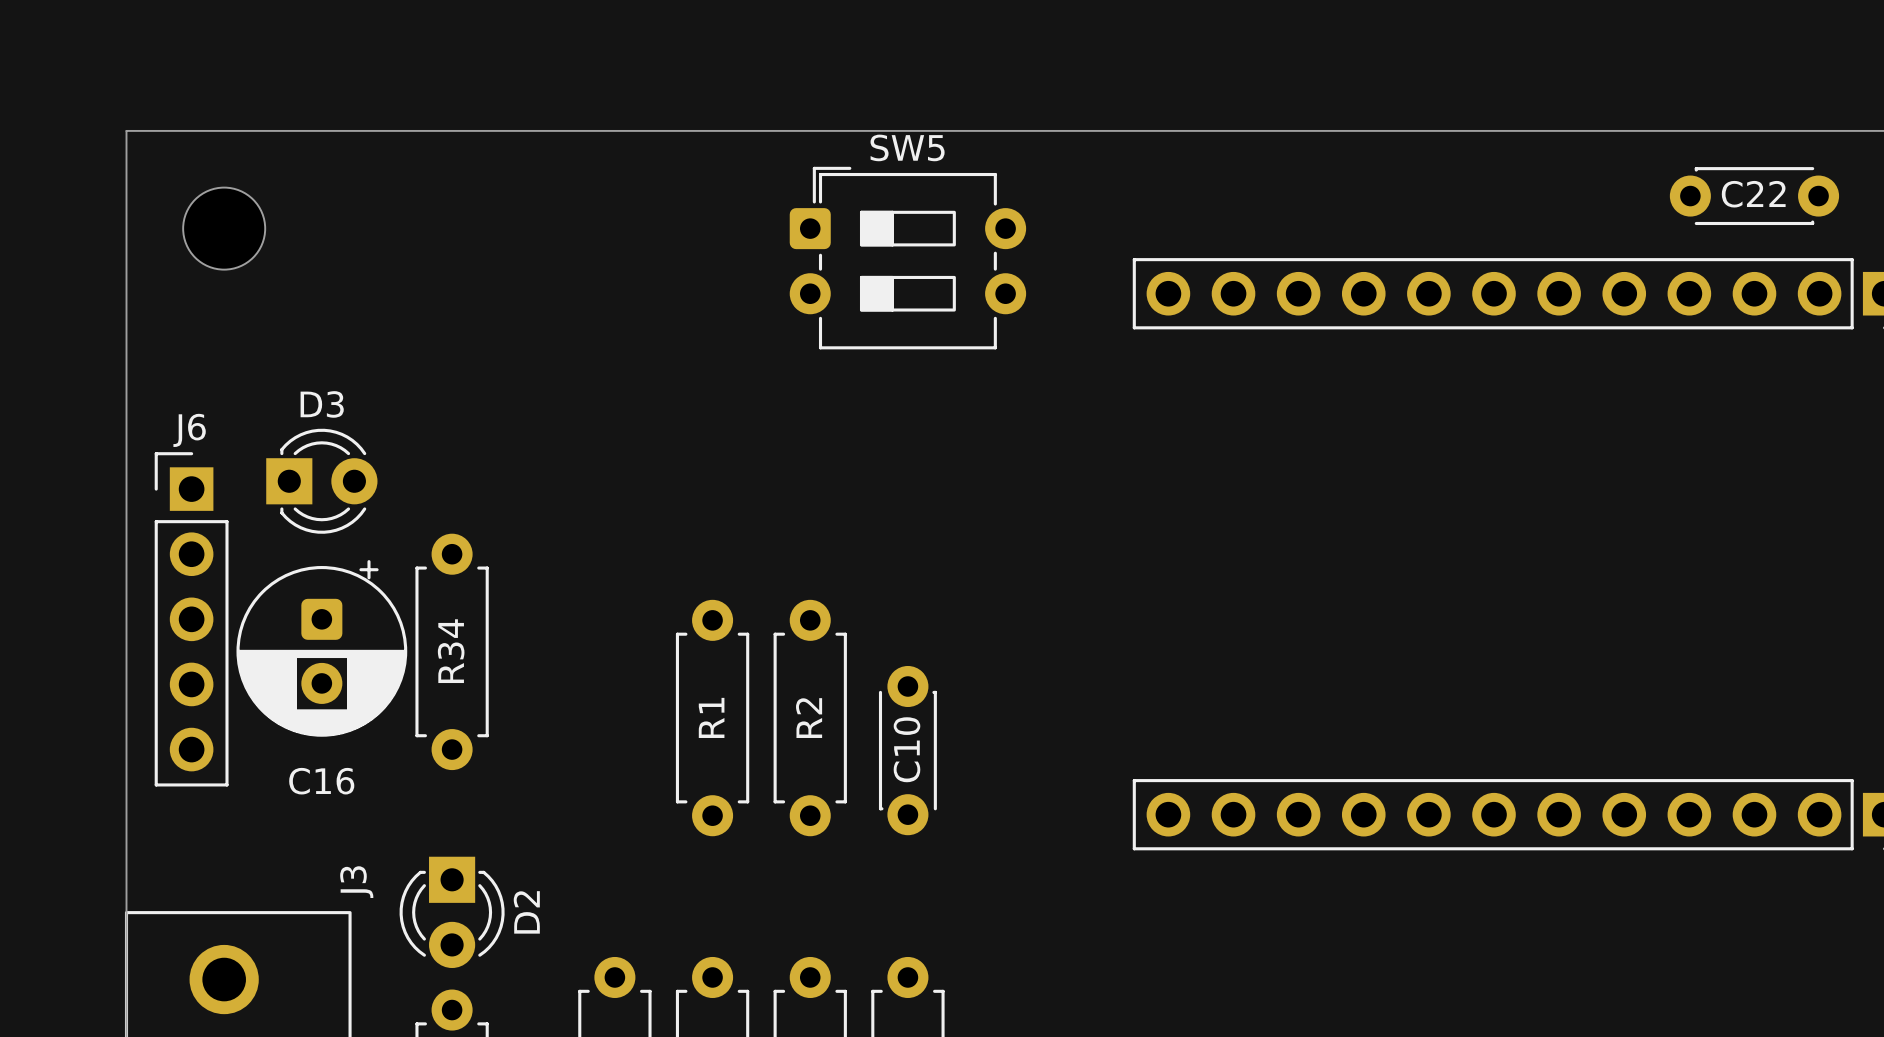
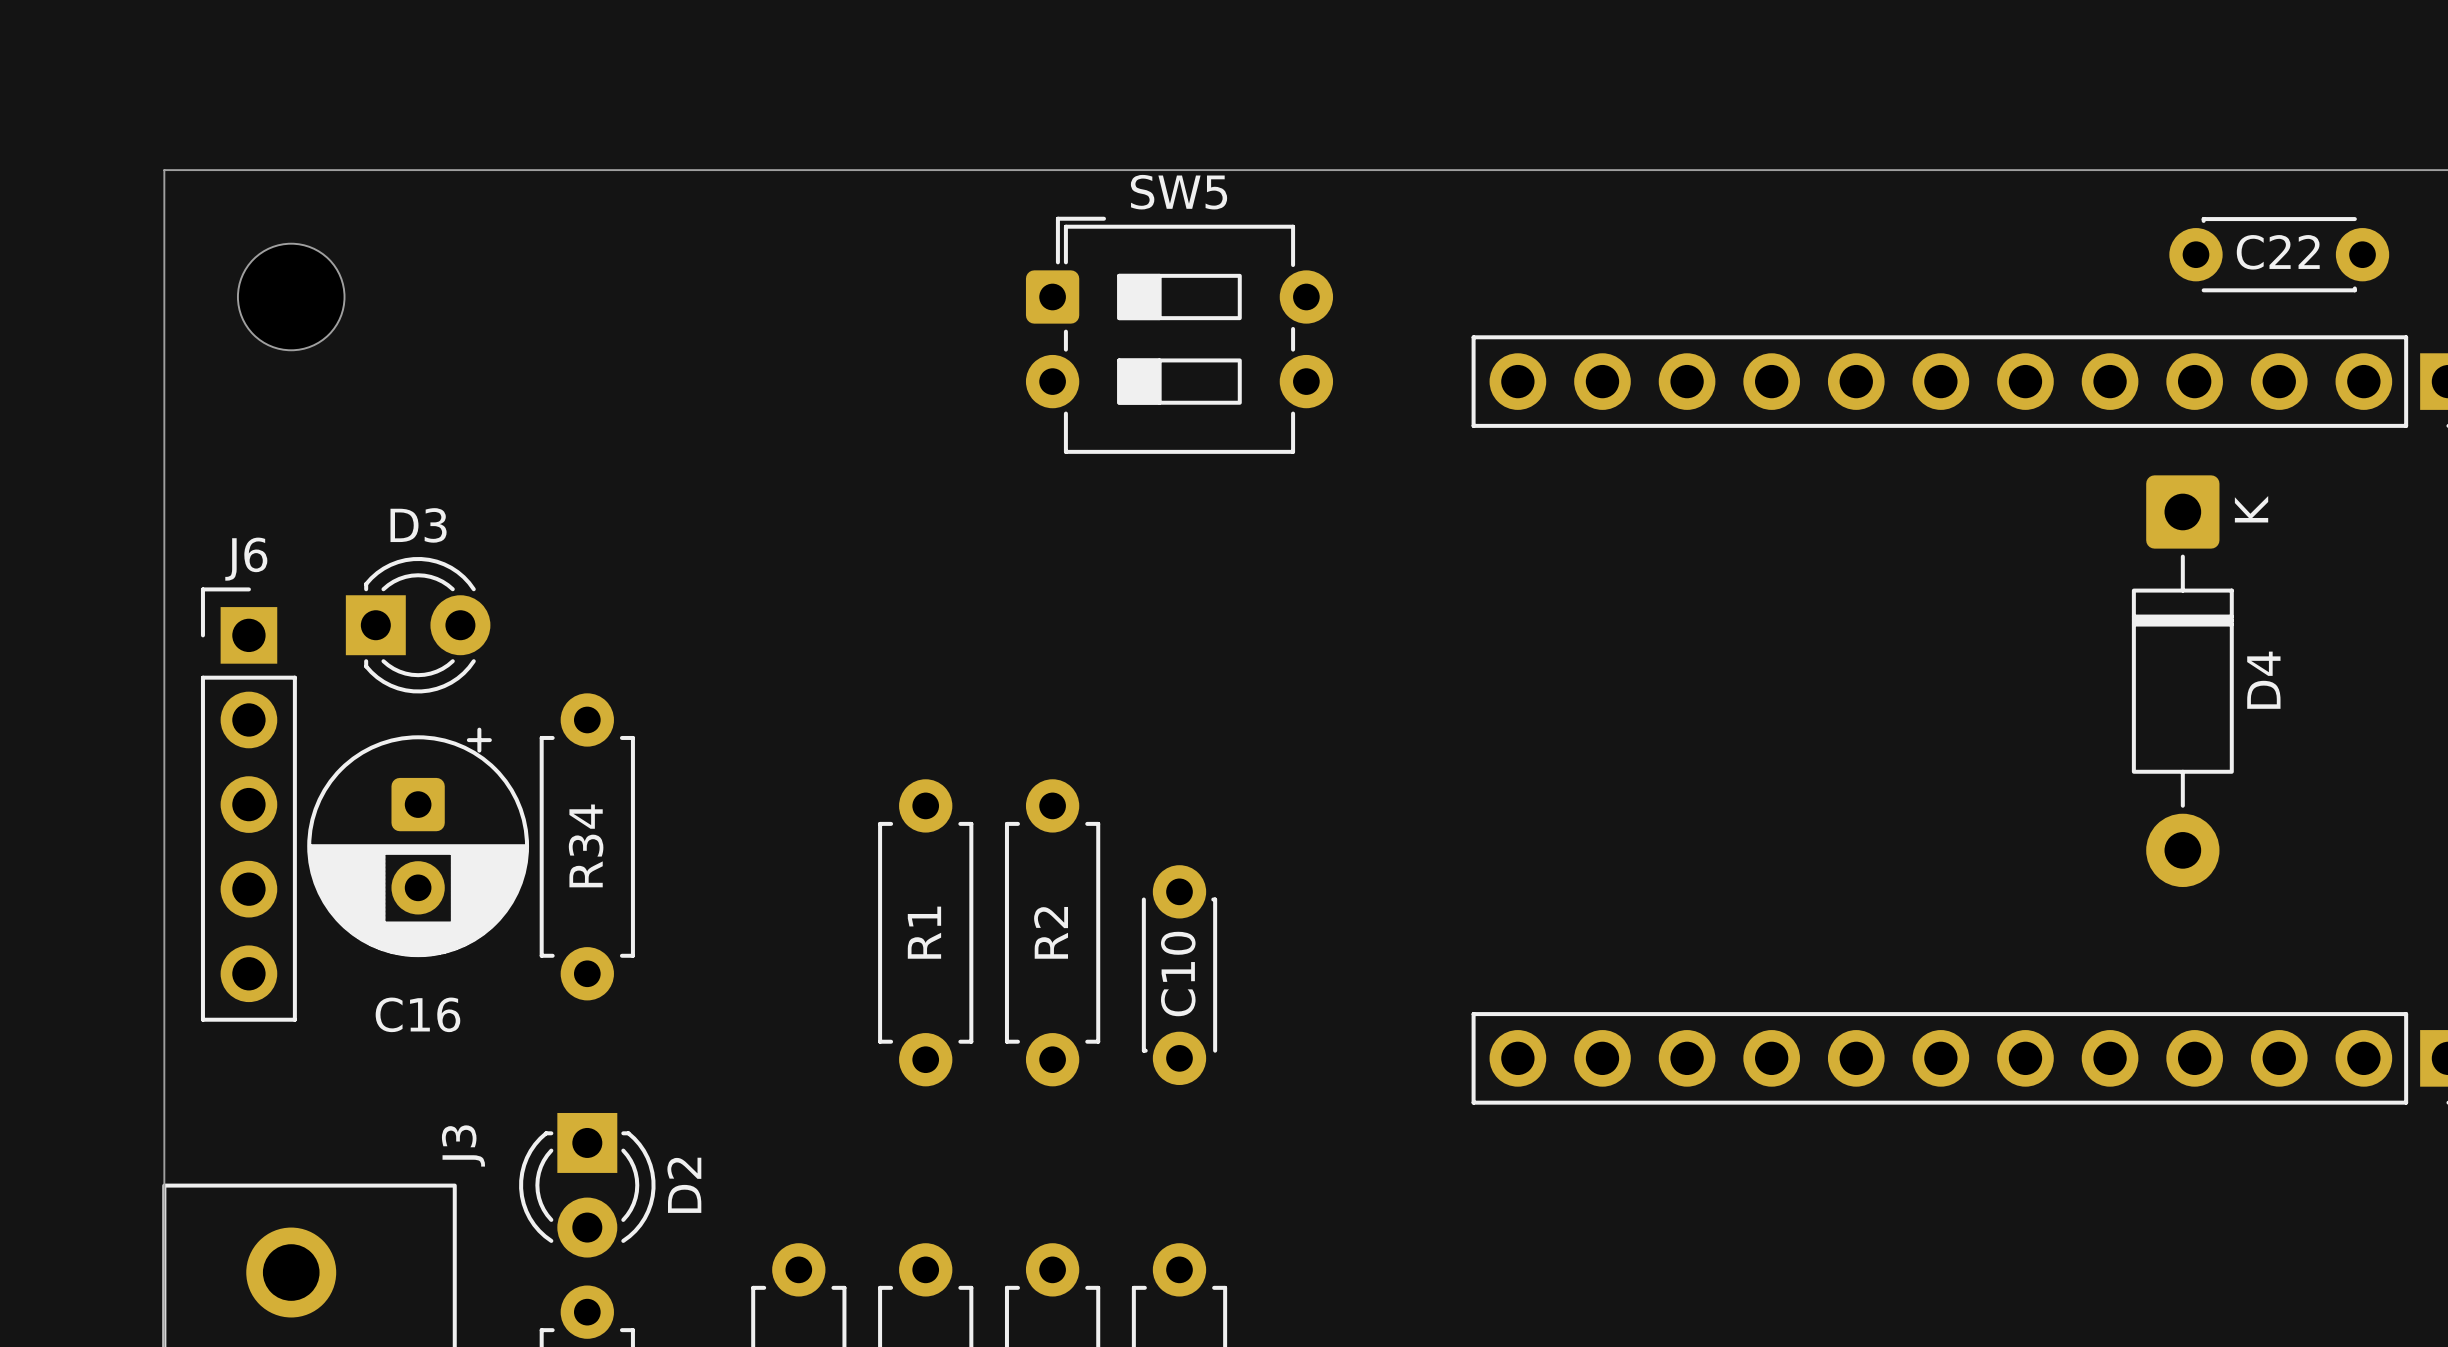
D4: none -> (2182, 681)

